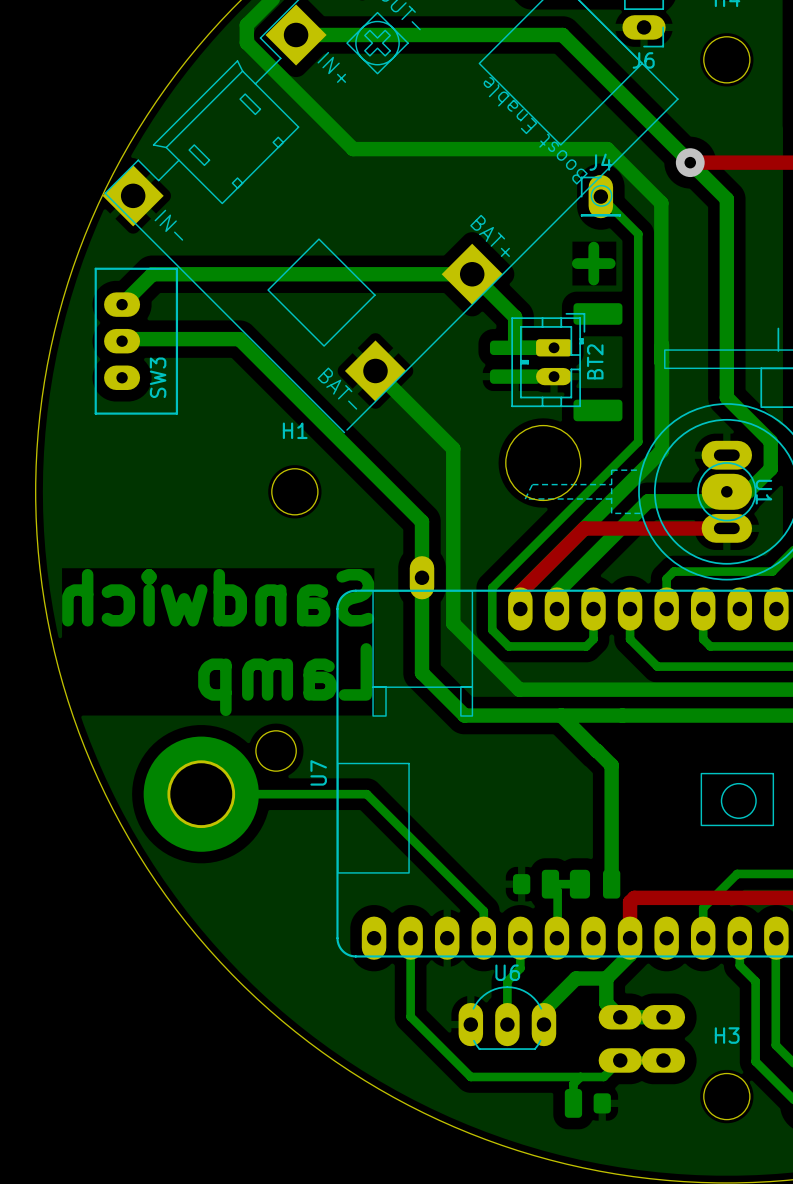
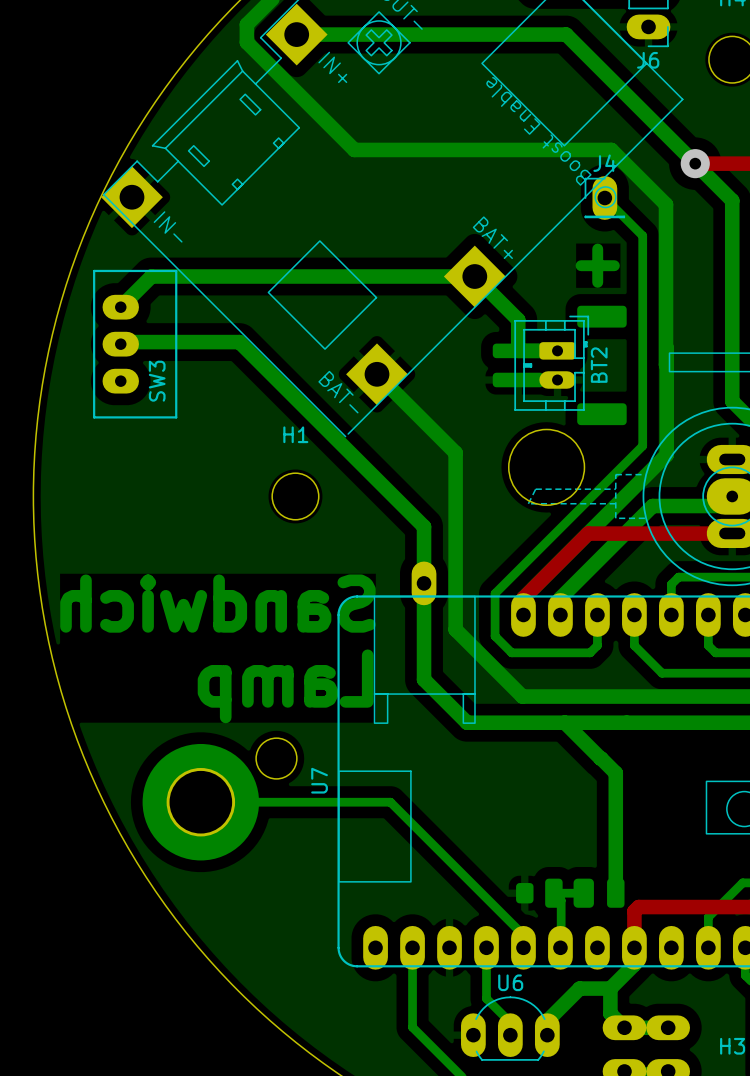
bottom track: (366, 794) (483, 911) (483, 938) -> (368, 802) (390, 802) (523, 935) (523, 947)
bottom track: (520, 938) (520, 968) (507, 981) (507, 1012) -> (486, 947) (486, 998) (510, 1022)

